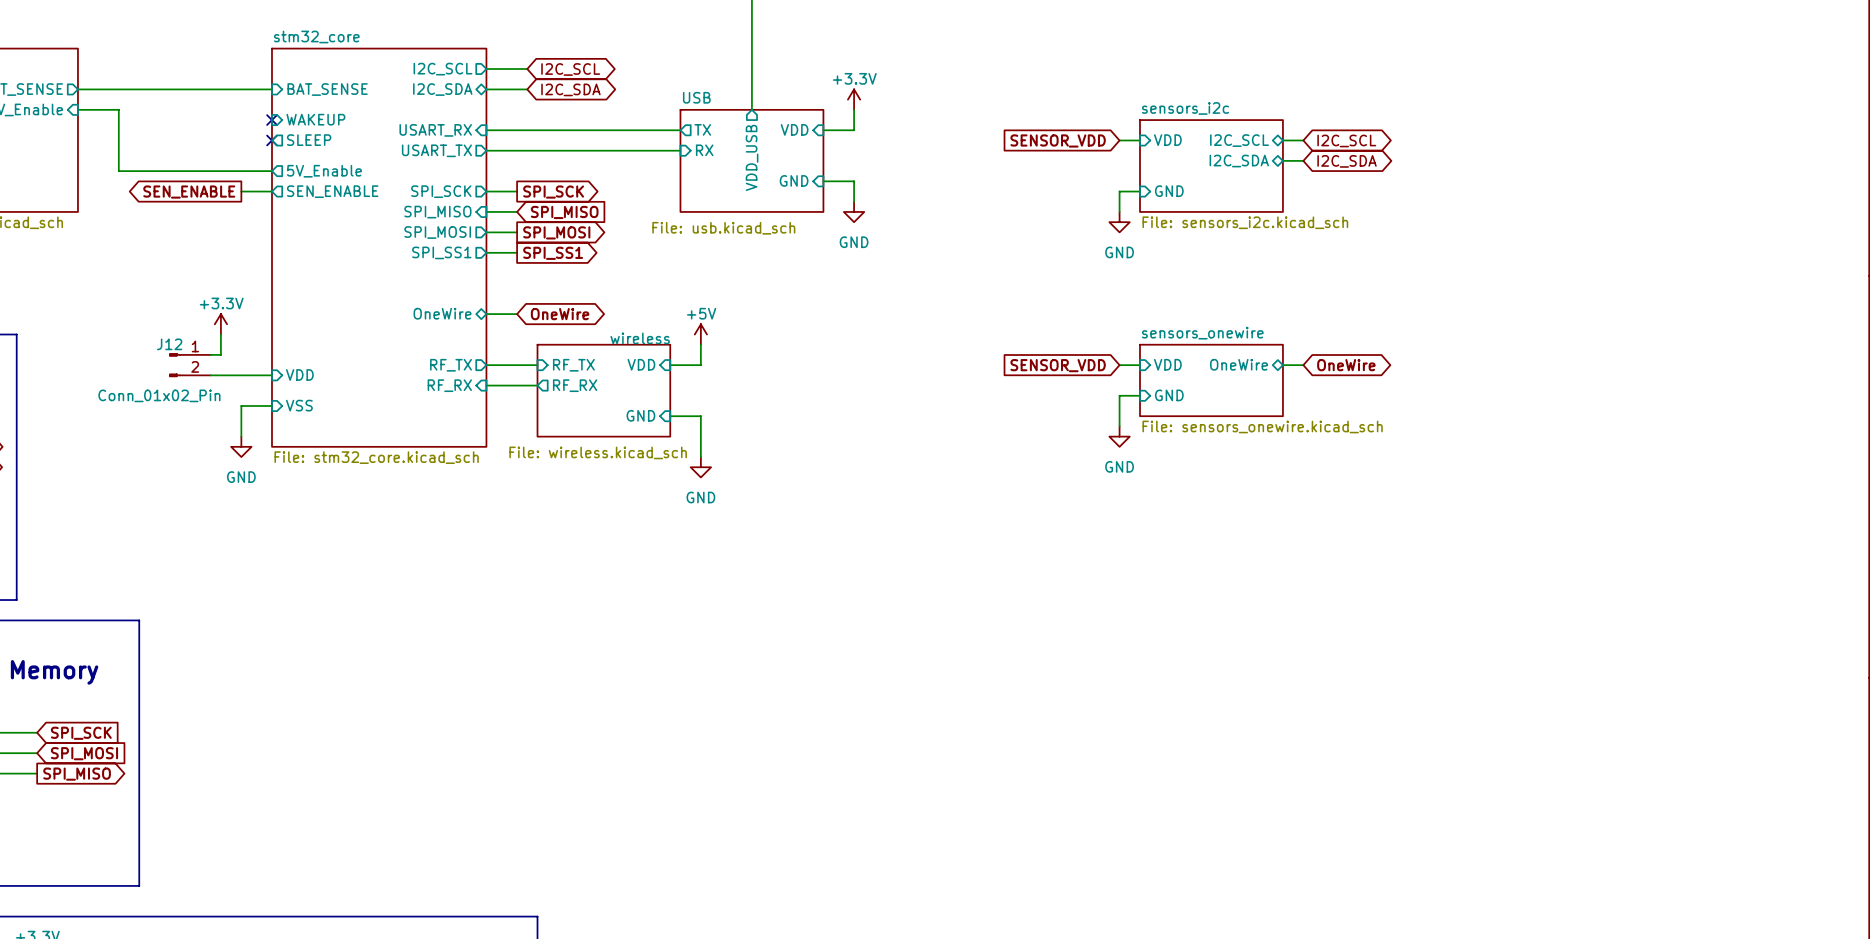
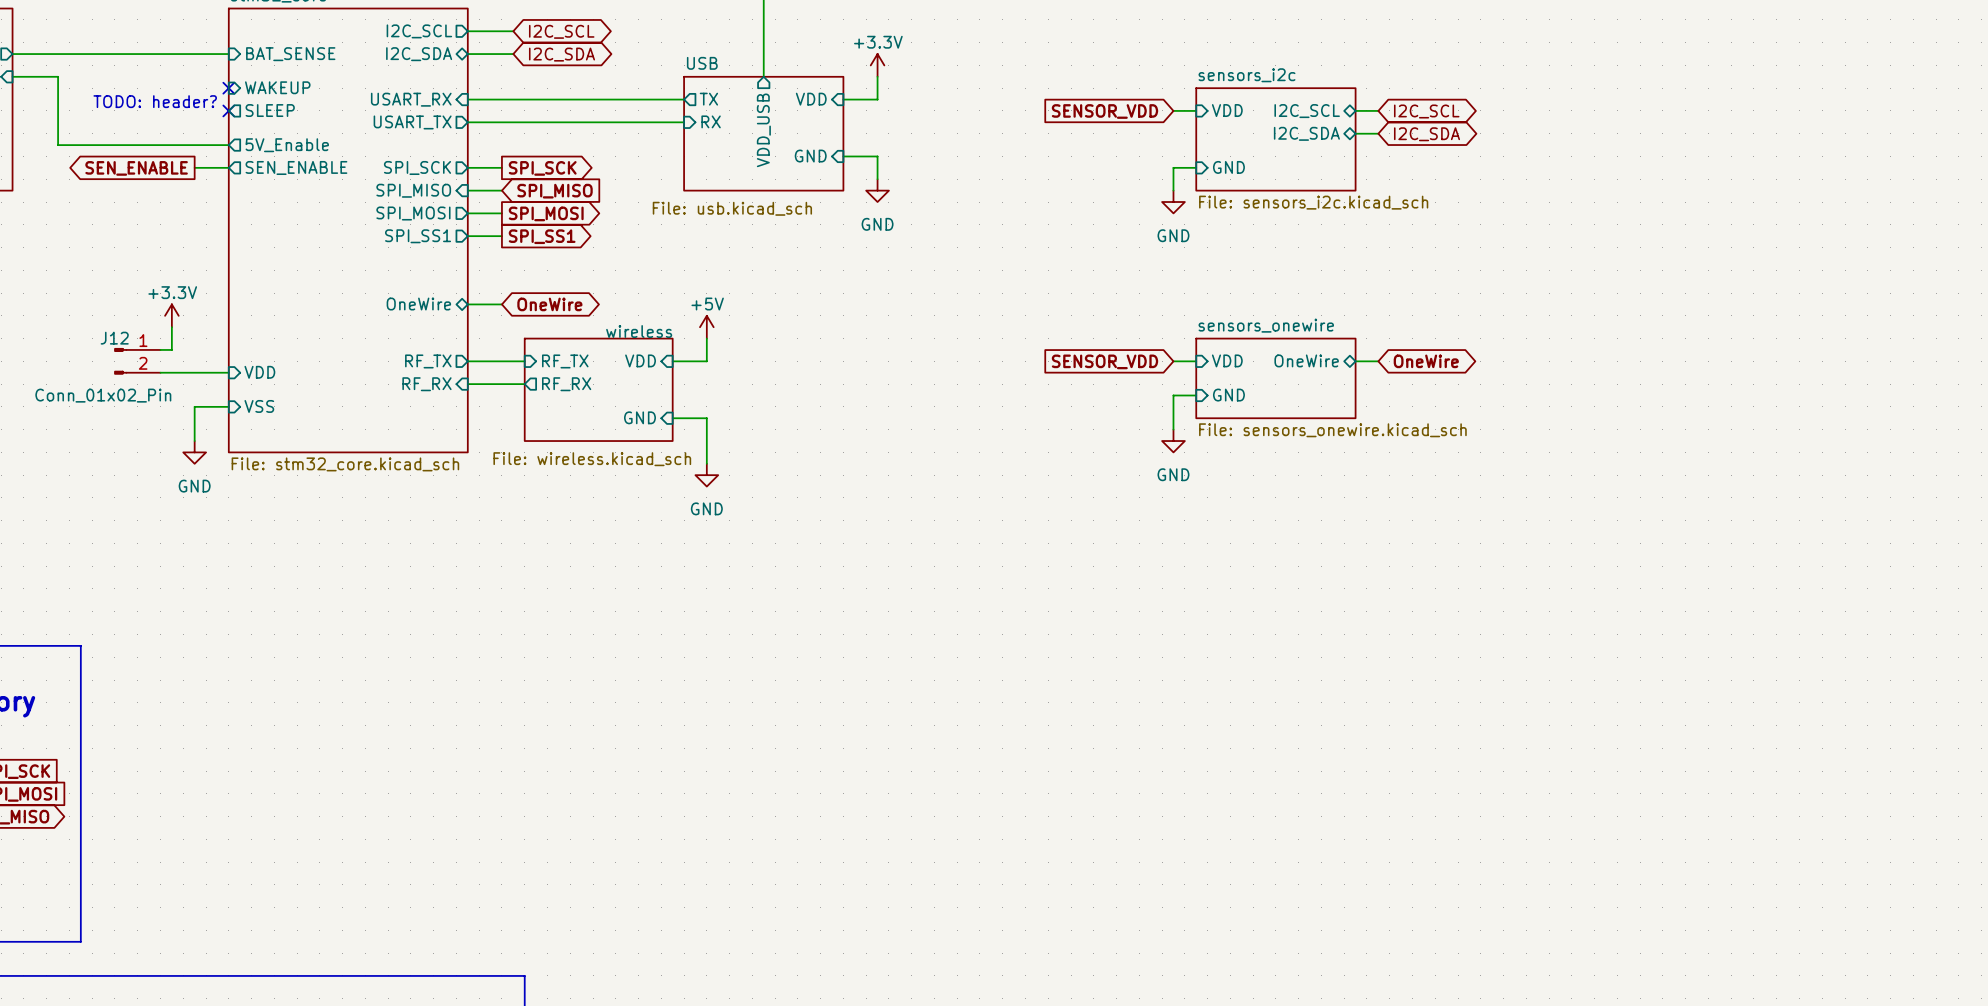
text: none -> TODO: header? (155, 101)

